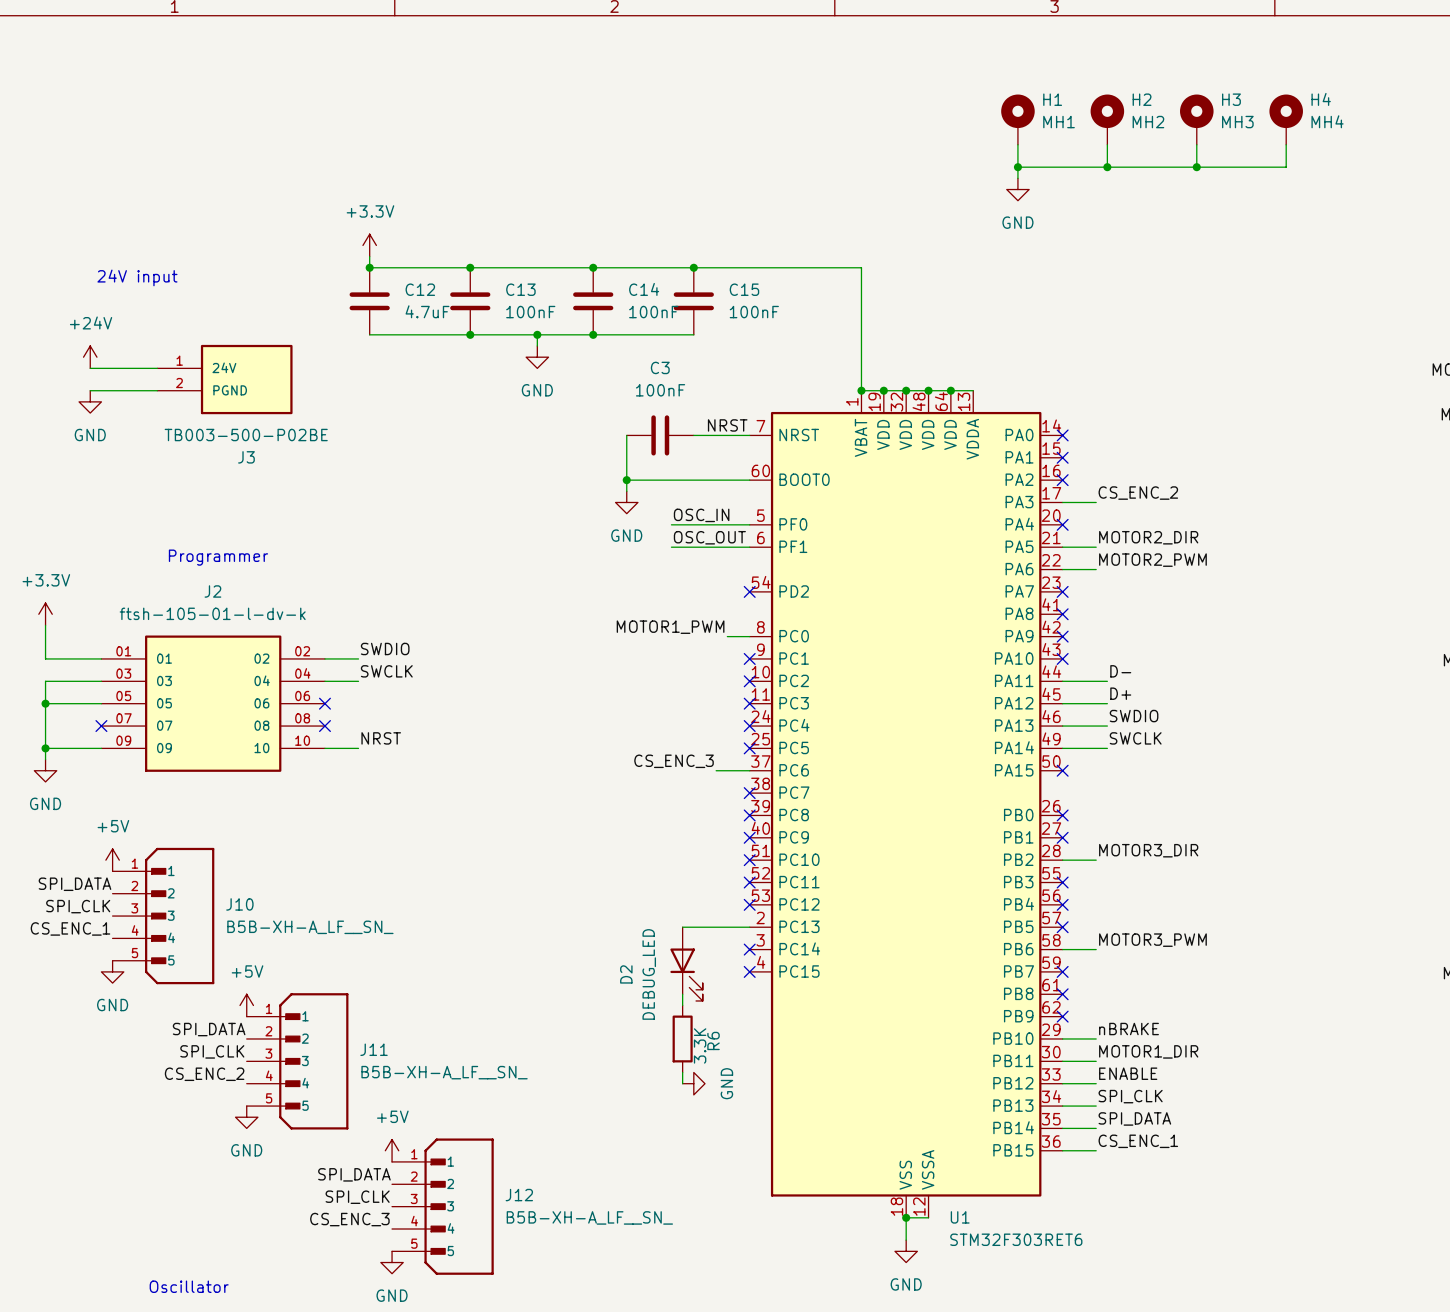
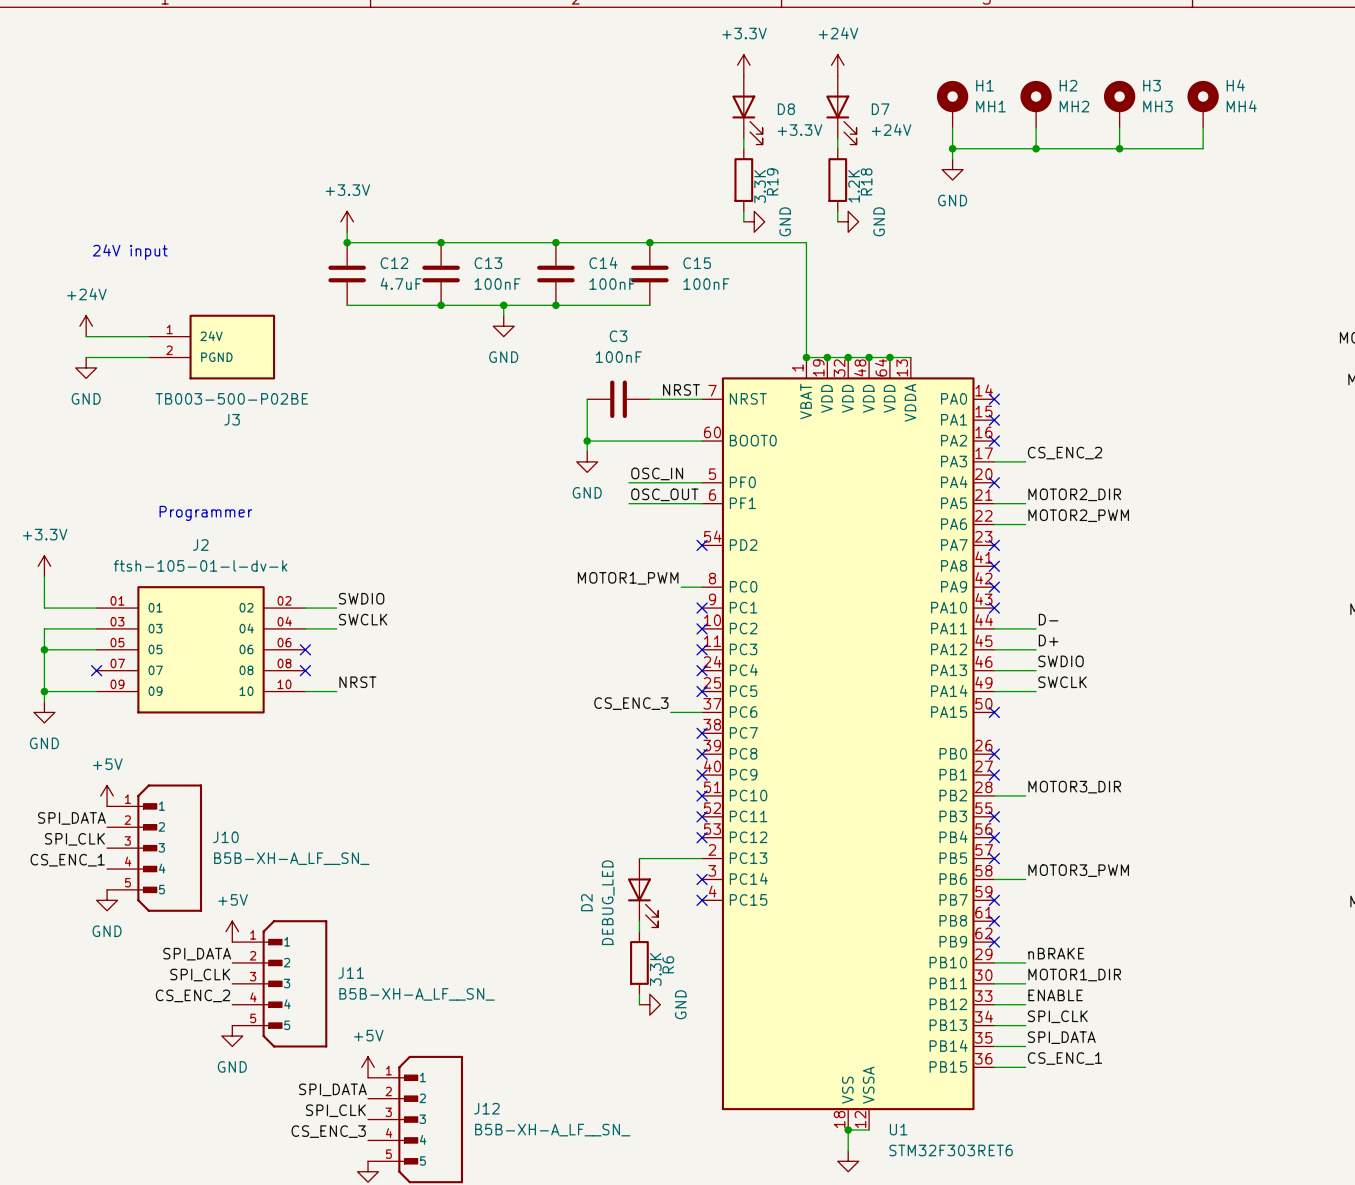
power symbol: none -> +3.3V (743, 65)
power symbol: none -> +24V (837, 65)
D8: none -> +3.3V (747, 110)
D7: none -> +24V (841, 110)
wire: none -> (743, 138) (743, 148)
wire: none -> (837, 138) (837, 148)
R19: none -> 3.3K (743, 180)
R18: none -> 1.2K (837, 180)
wire: none -> (743, 211) (743, 221)
wire: none -> (837, 211) (837, 221)
power symbol: none -> GND (754, 221)
power symbol: none -> GND (848, 221)

